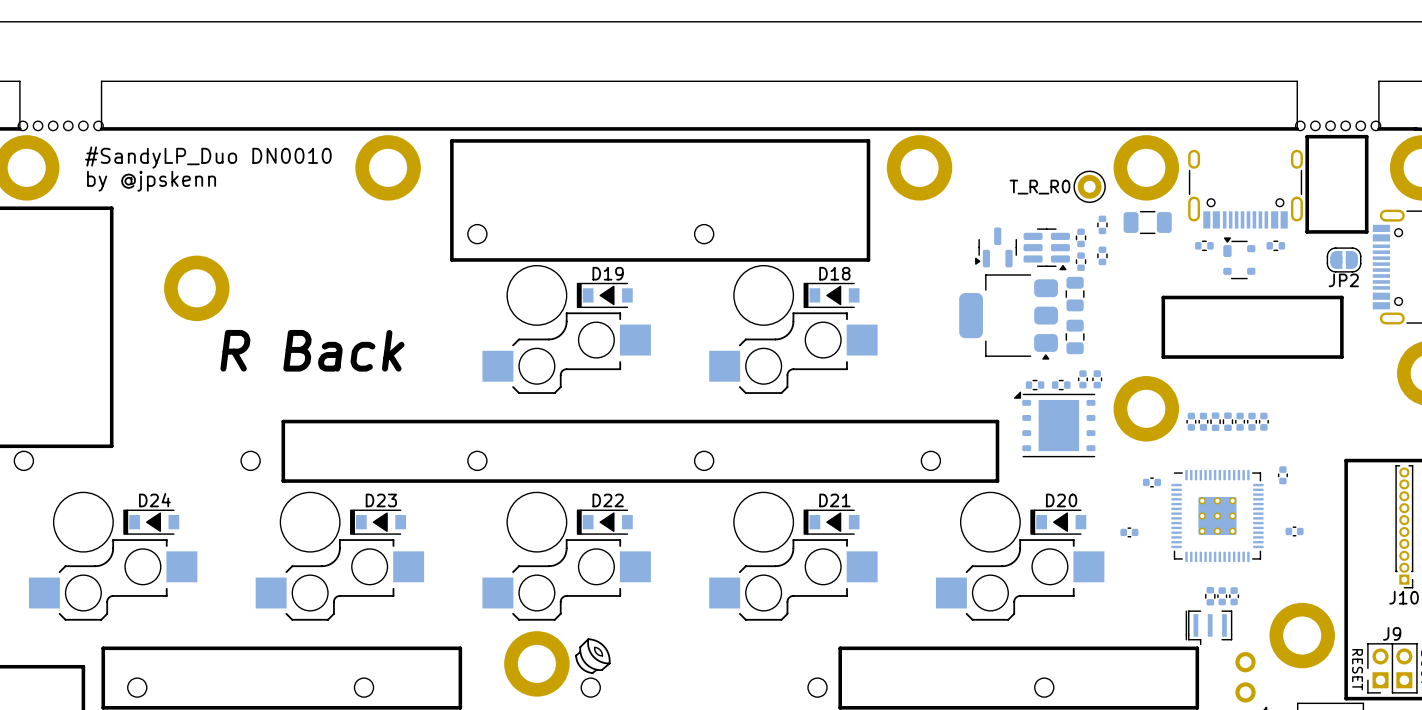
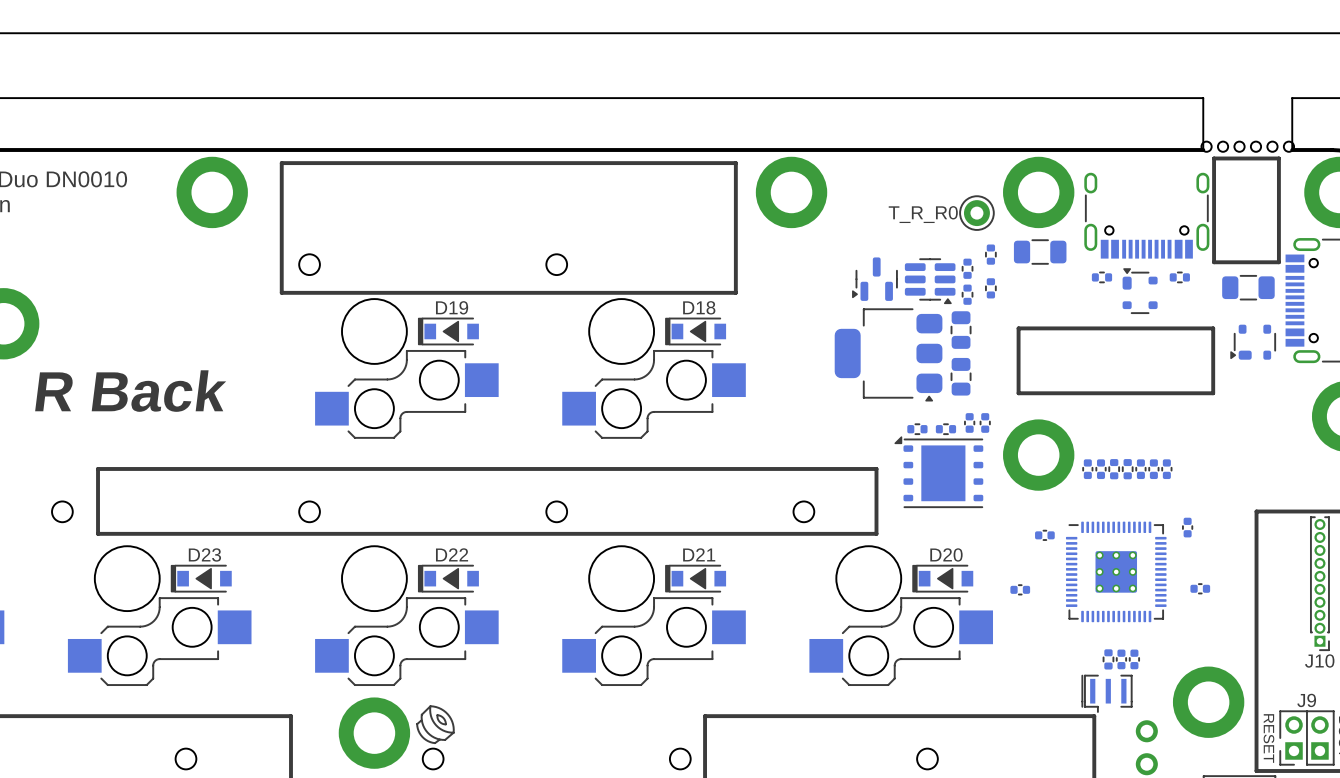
part: none -> (1248, 287)
JP2: (1344, 259) -> none
line: (1341, 297) (1163, 297) (1163, 357) (1341, 357) (1341, 297) -> (1213, 328) (1213, 393) (1018, 393) (1018, 328) (1213, 328)
part: none -> (1253, 342)

